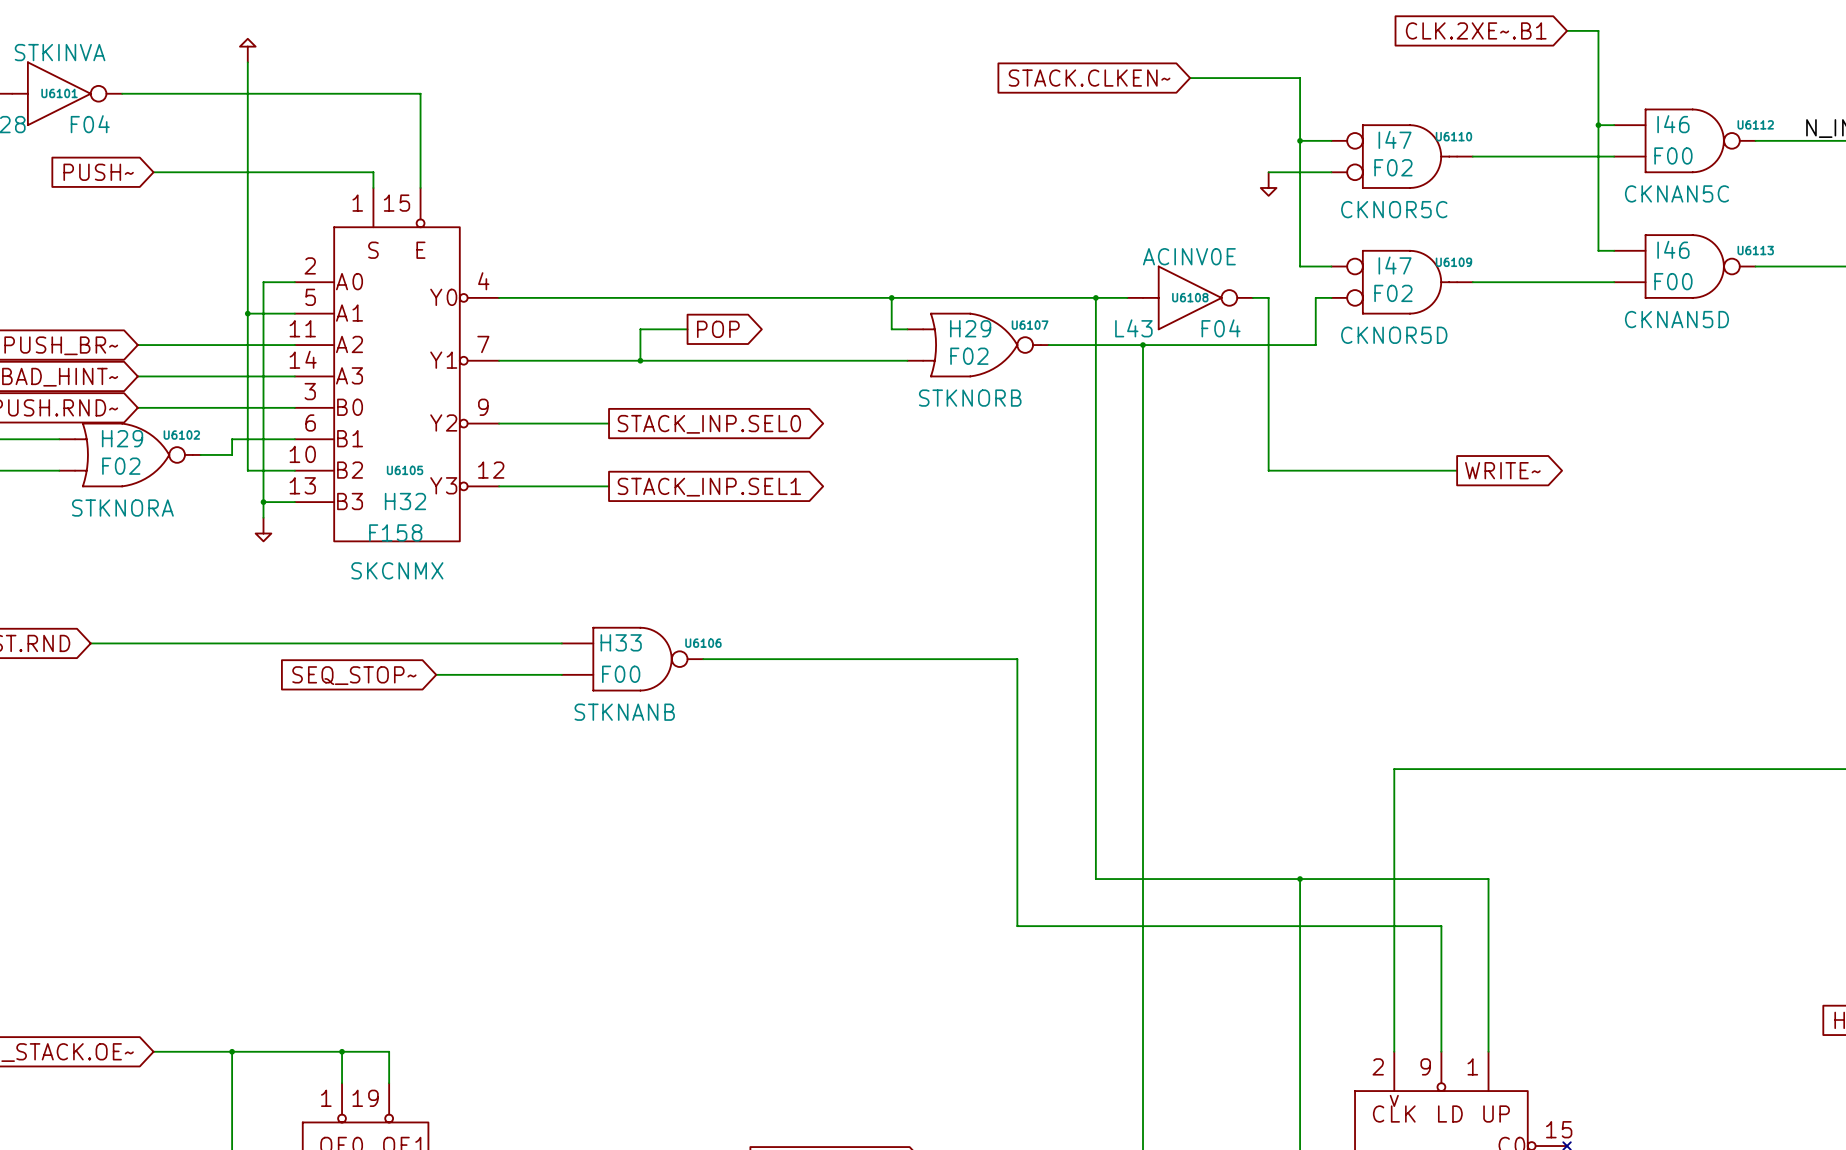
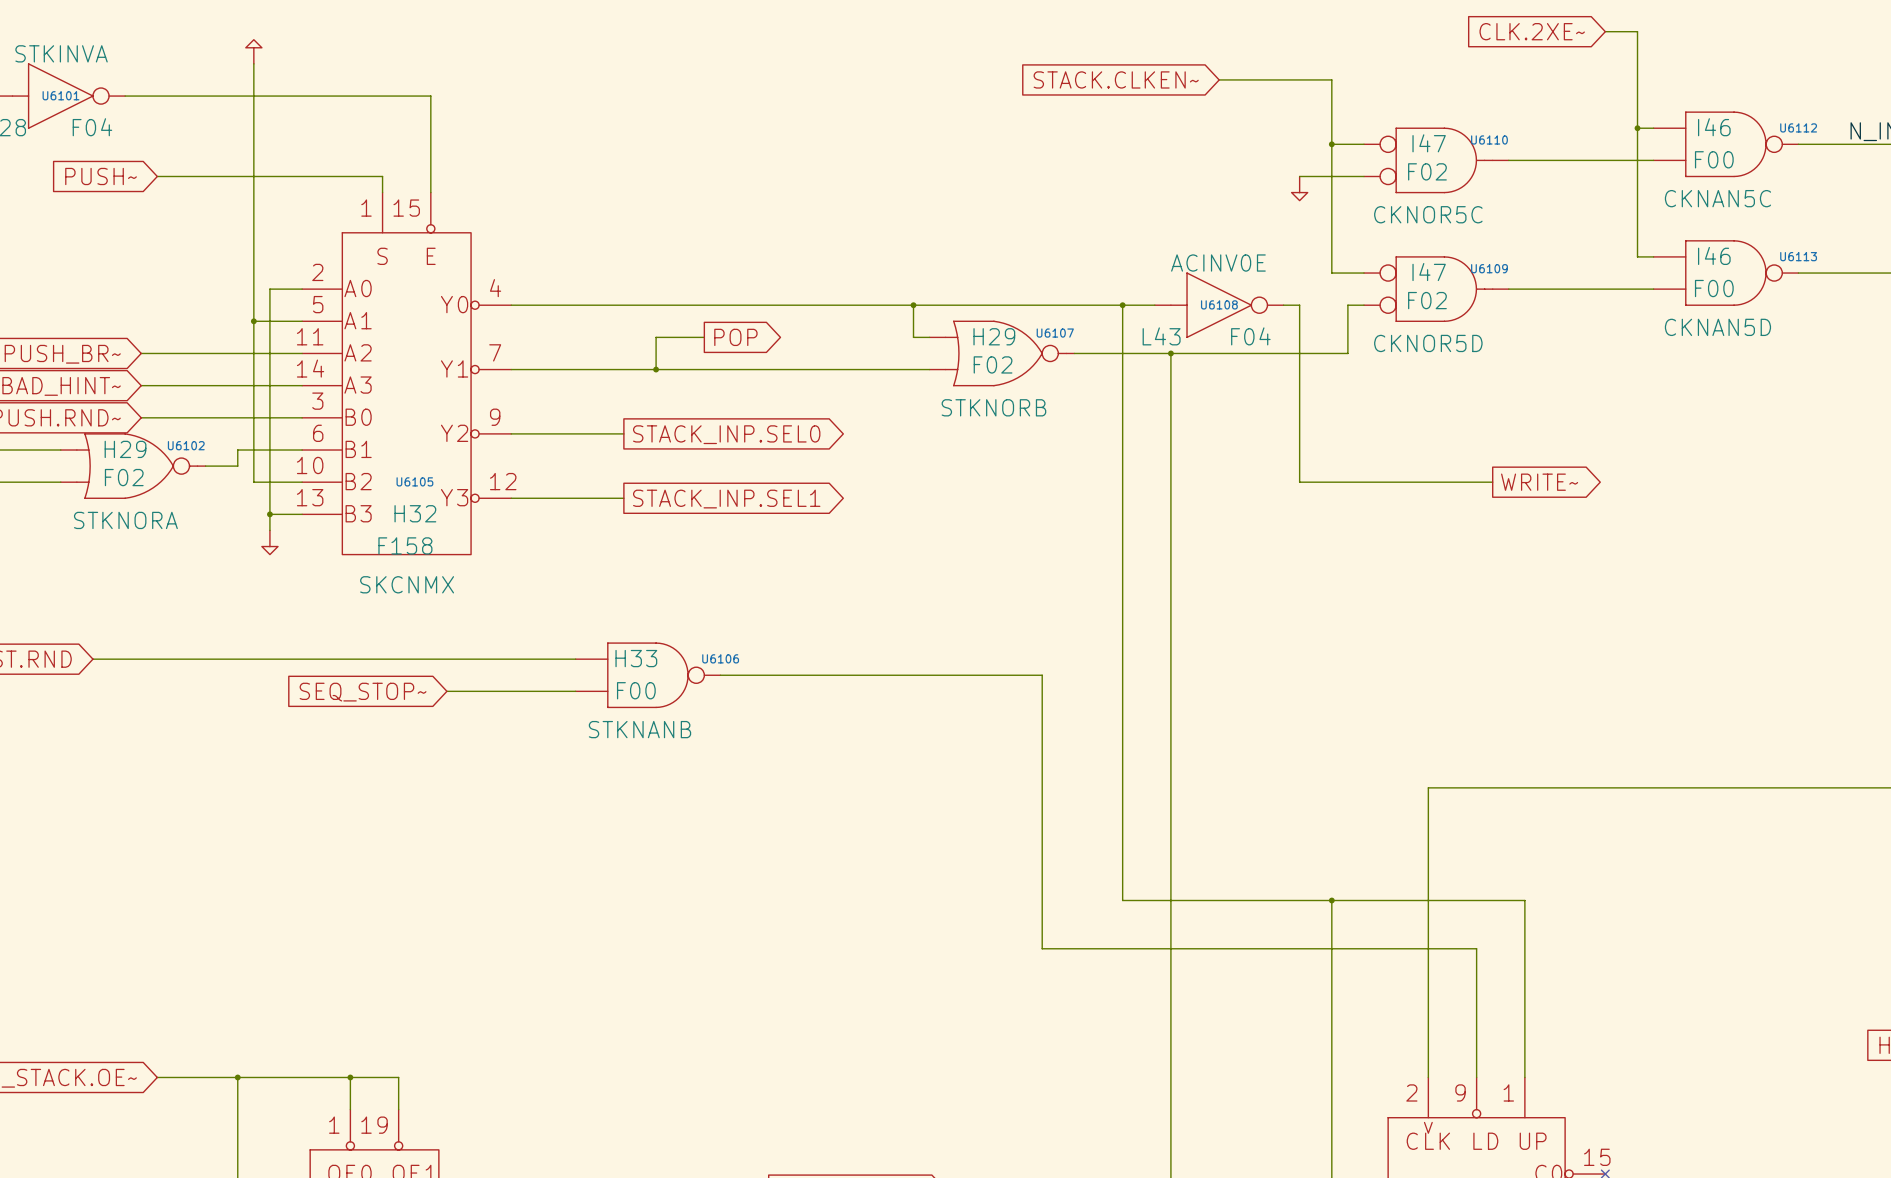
global label: CLK.2XE~.B1 (1476, 30) -> CLK.2XE~ (1532, 31)

